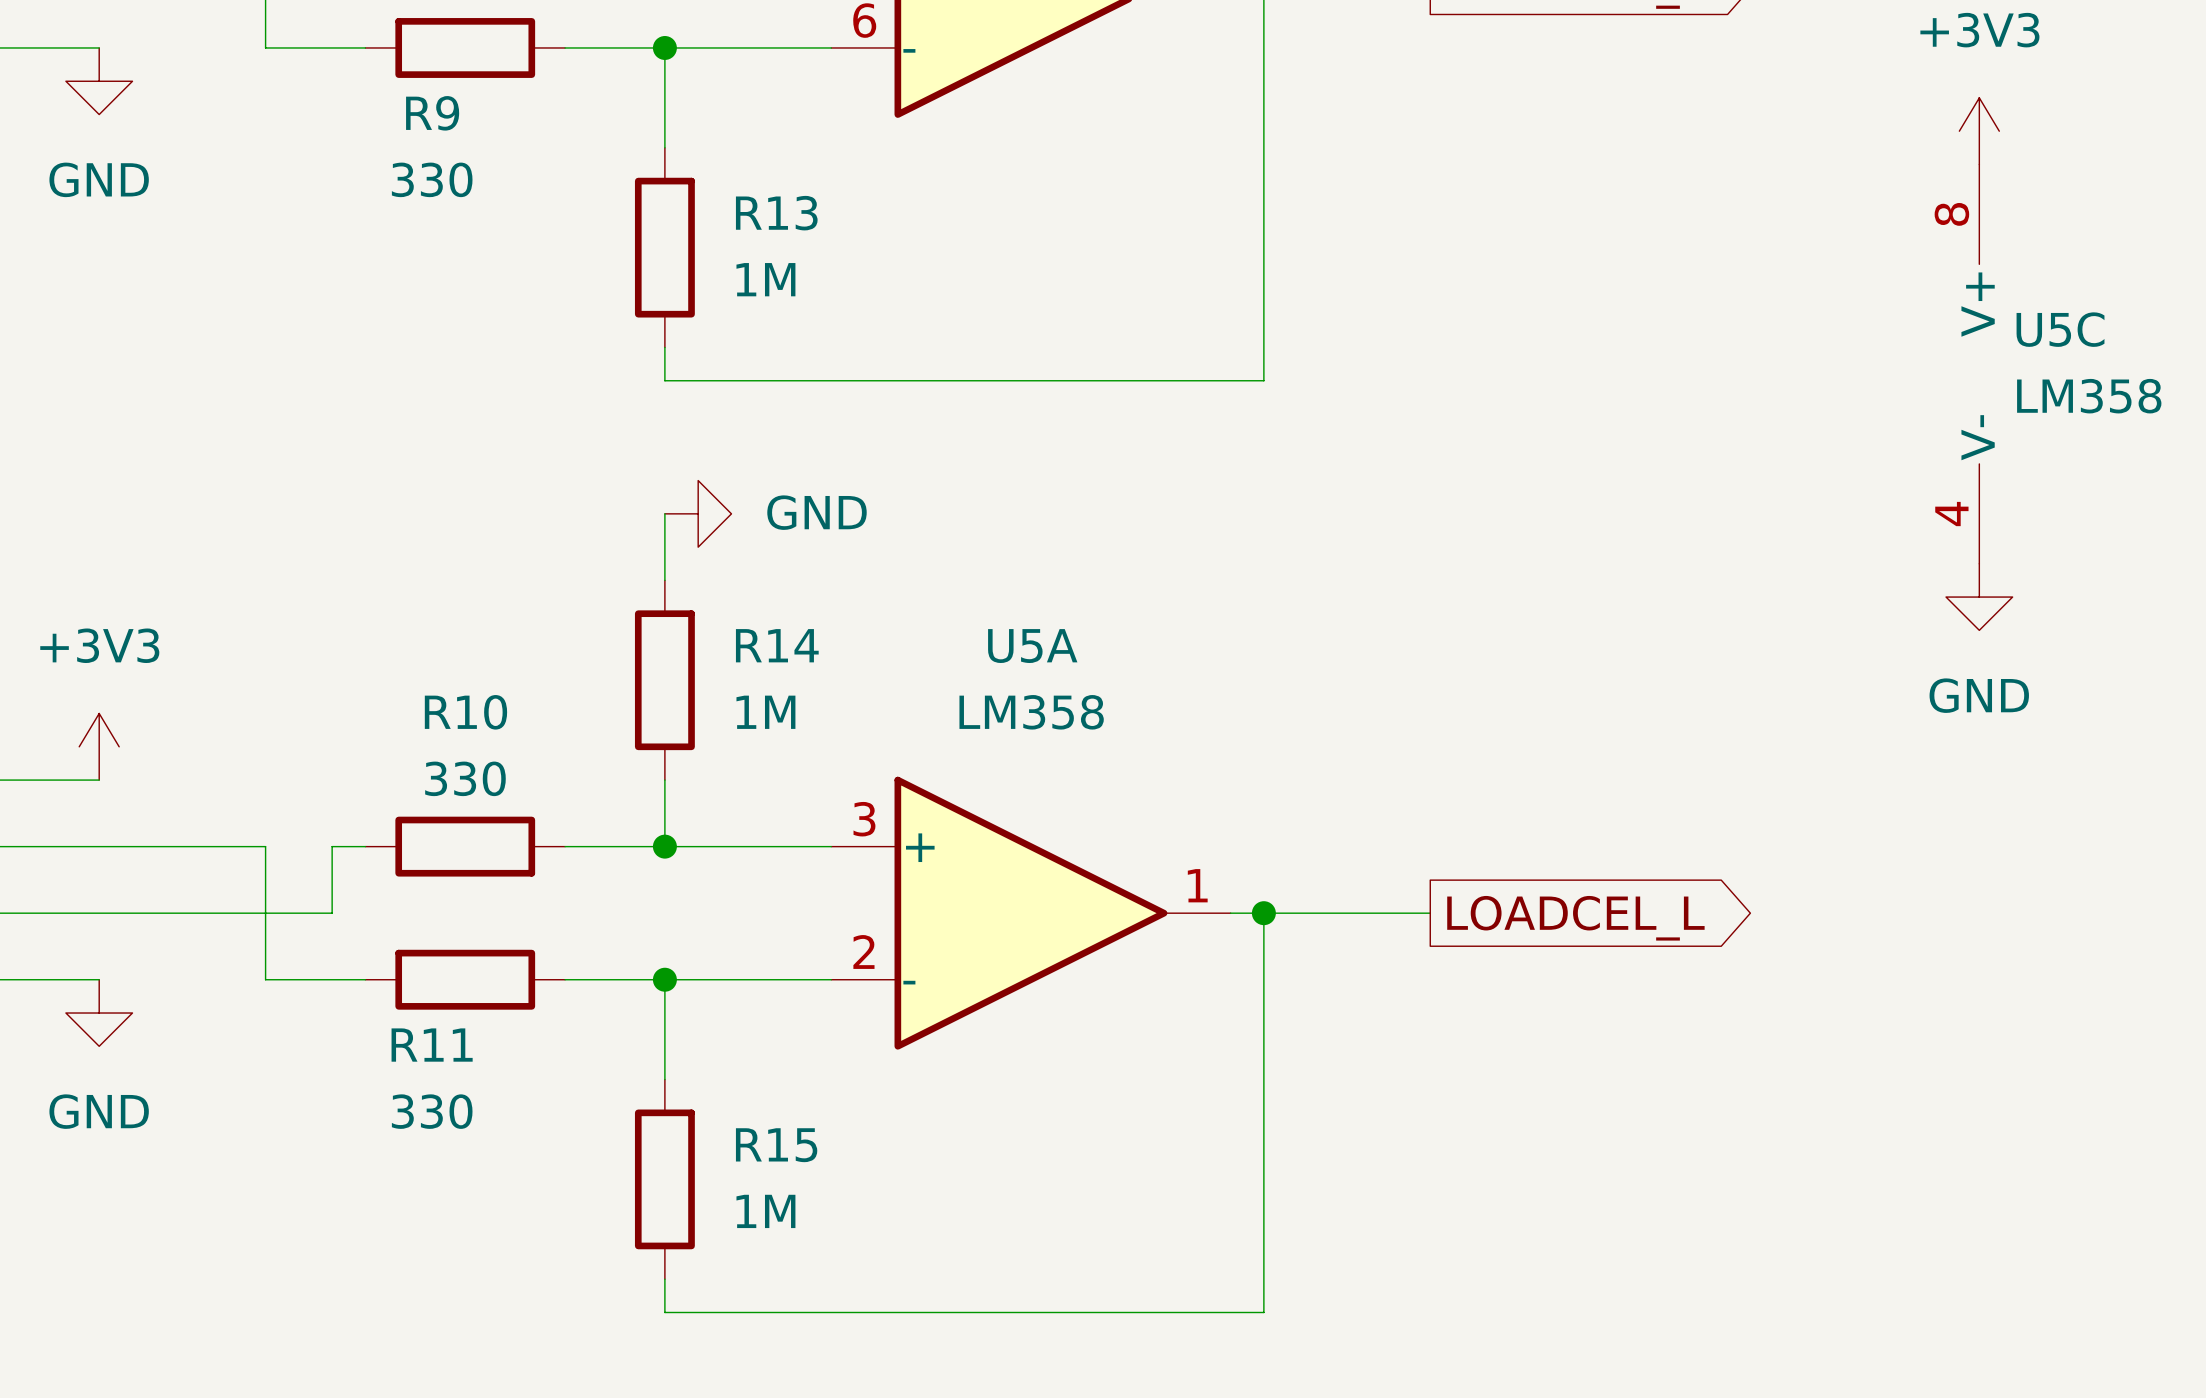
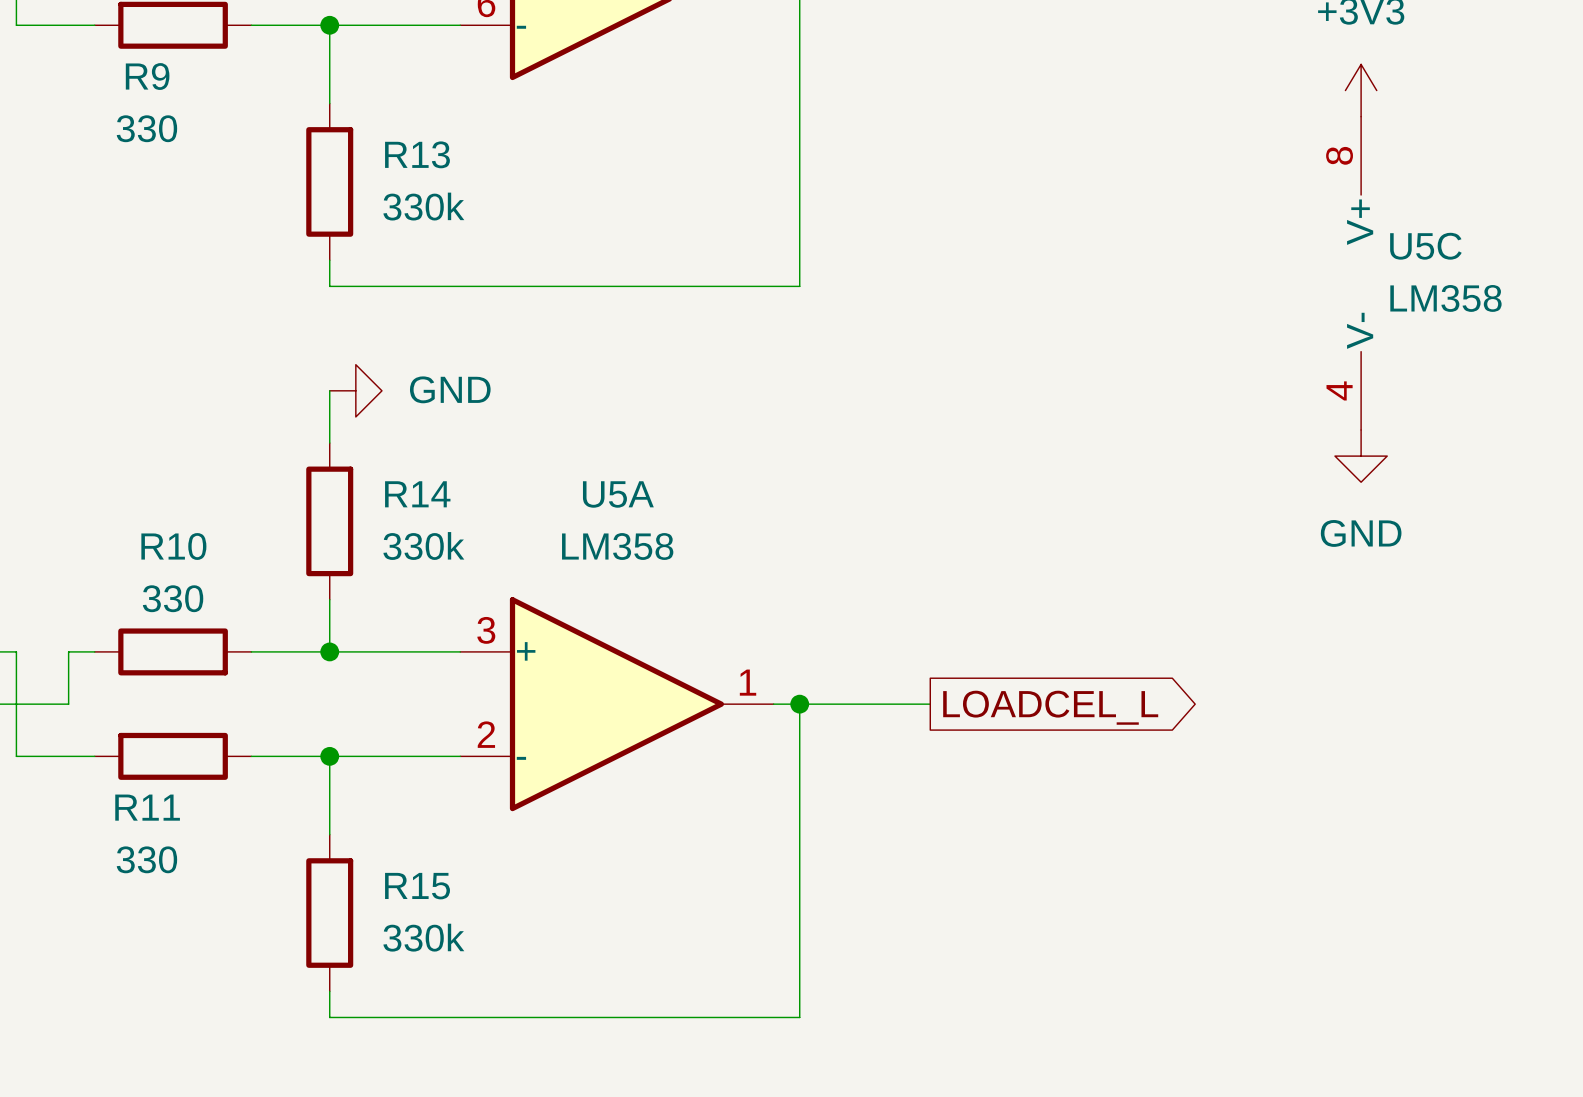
R13 value: 1M (765, 279) -> 330k (423, 206)
R14 value: 1M (765, 712) -> 330k (423, 546)
R15 value: 1M (765, 1211) -> 330k (423, 937)

